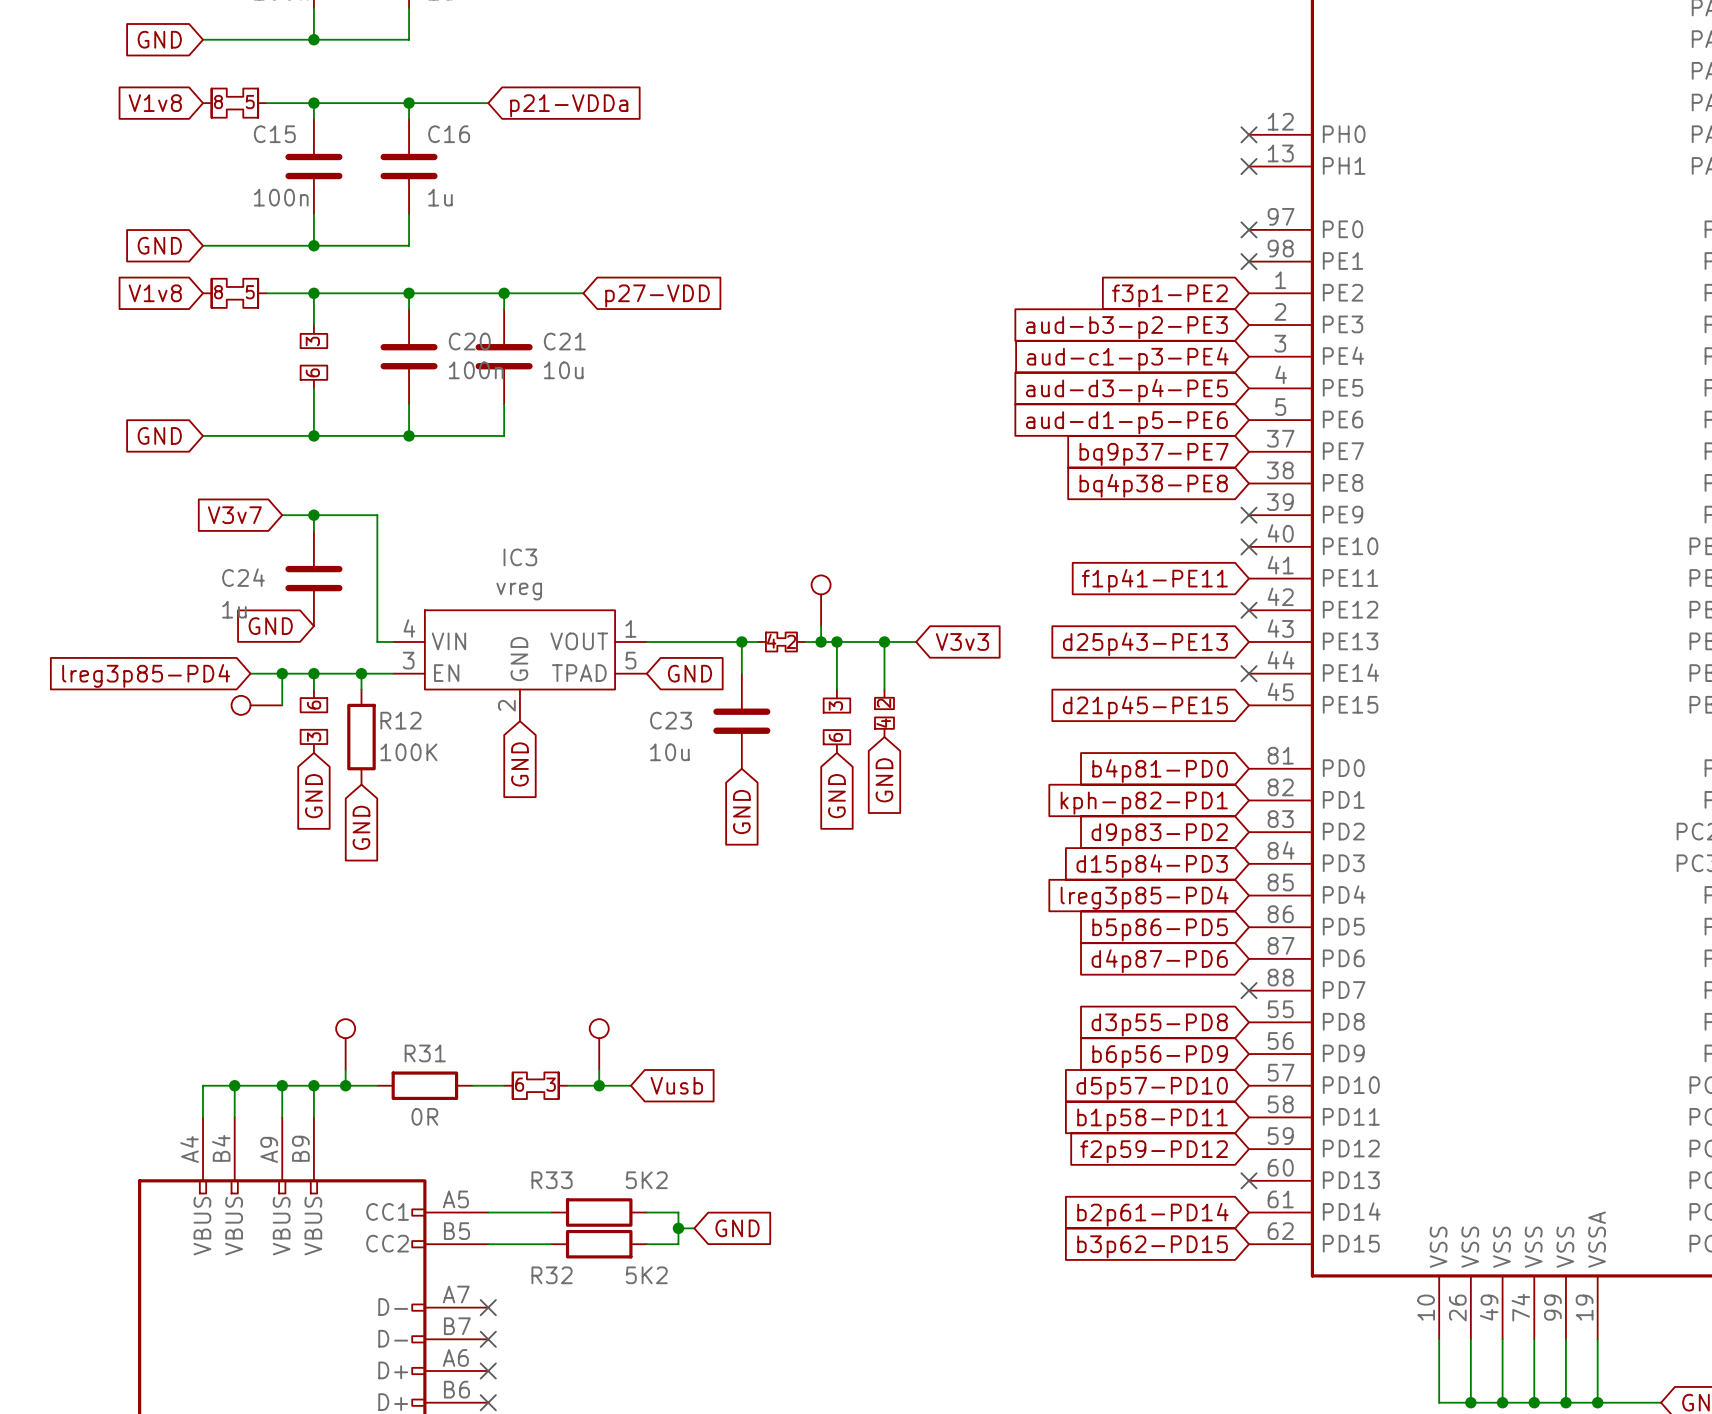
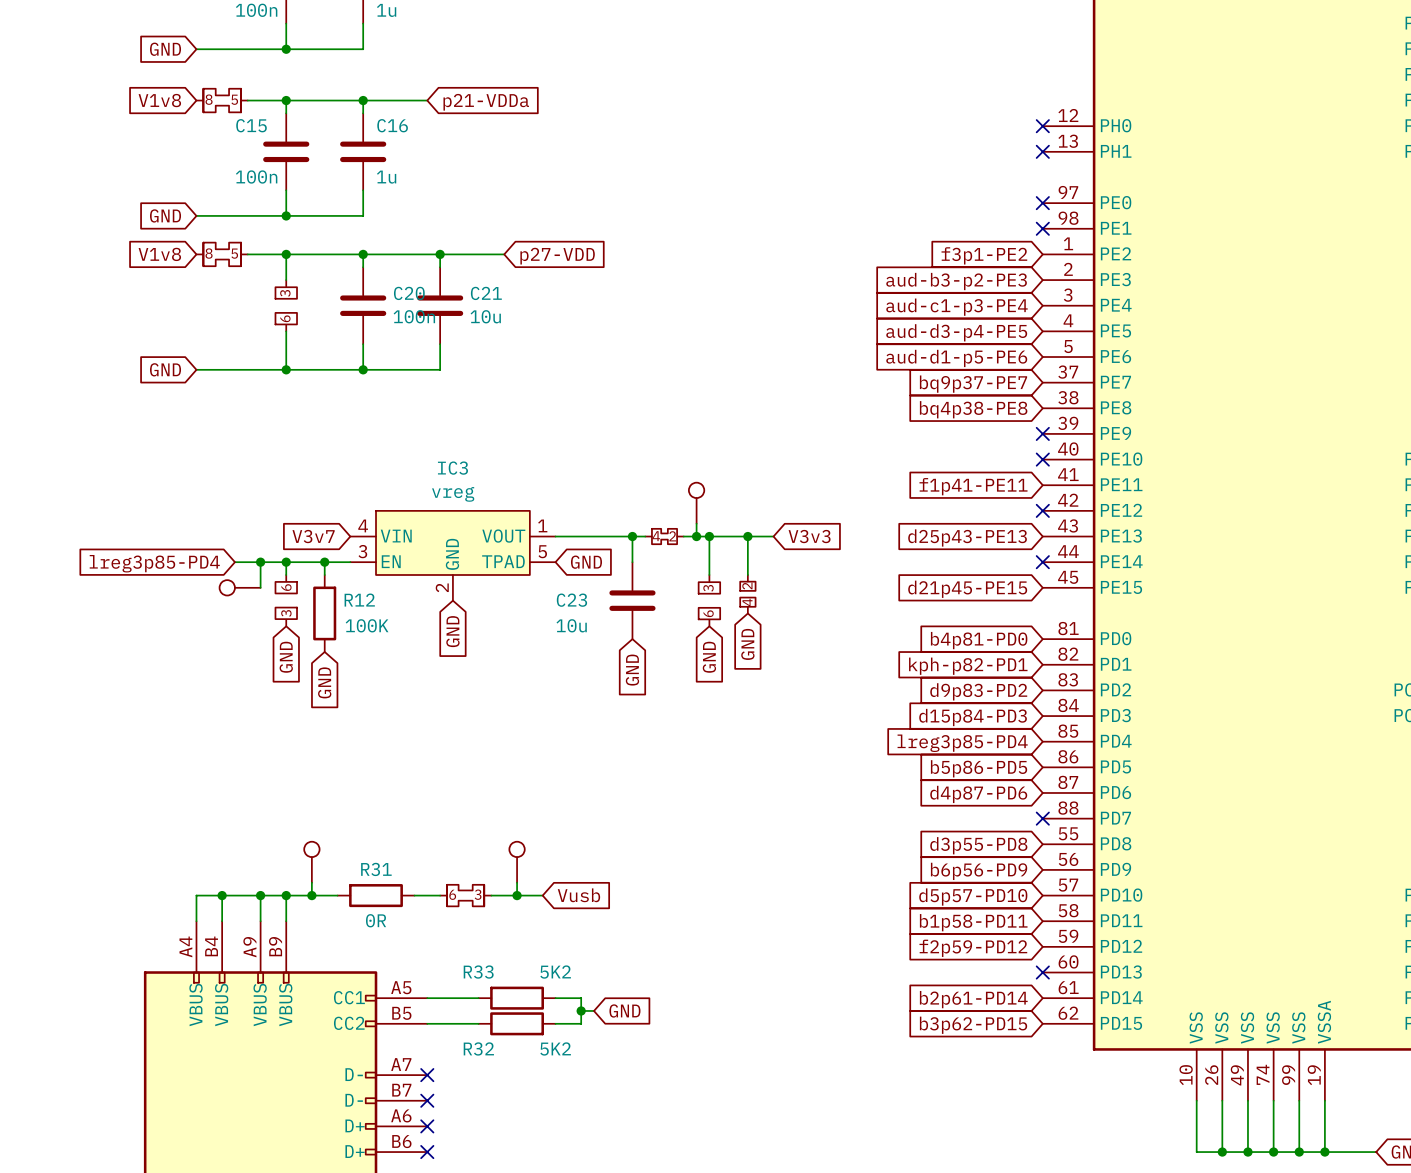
global label position: V3v7 (234, 515) -> V3v7 (313, 536)
wire: (282, 515) (377, 515) (377, 641) (393, 641) -> none
wire: (313, 515) (313, 531) -> none
junction: (313, 515) -> none
C24: 1u (313, 578) -> none
global label: GND (270, 626) -> none

